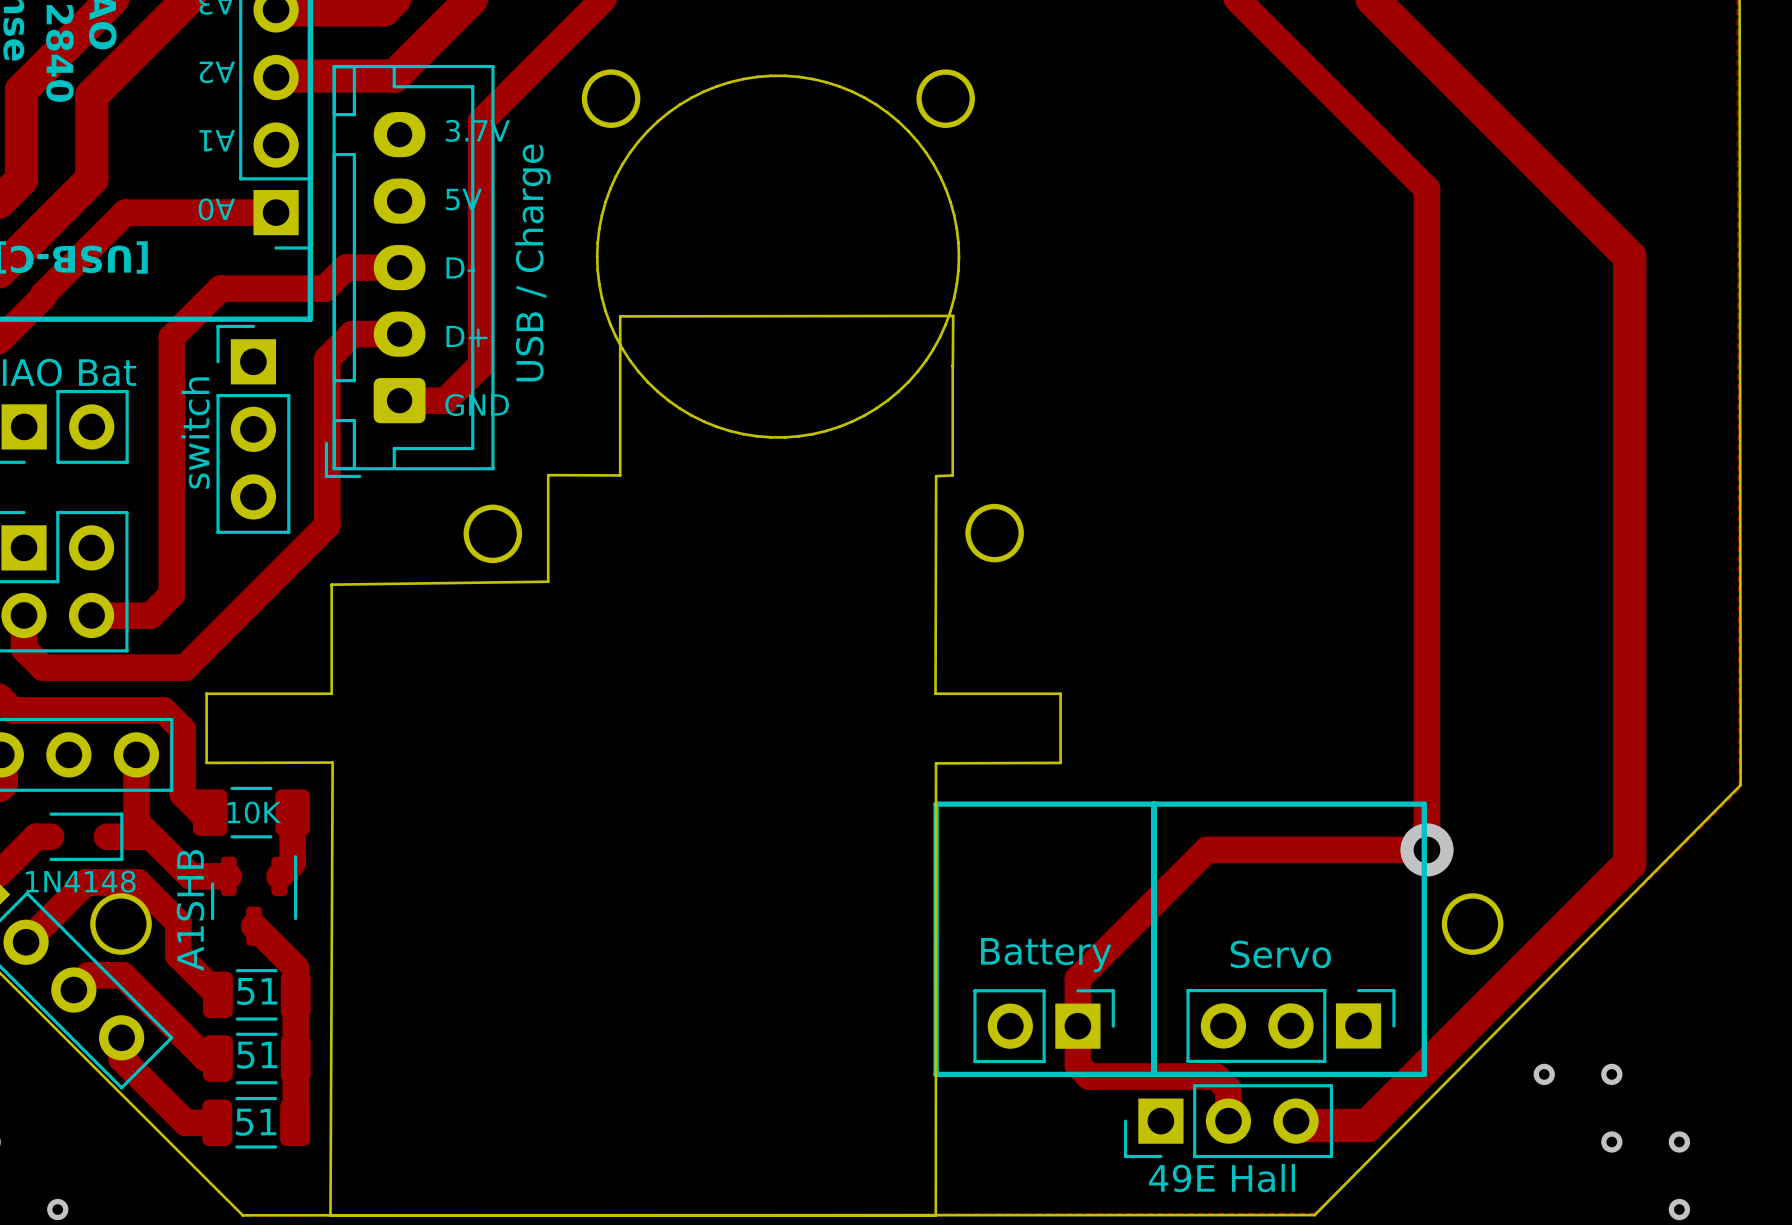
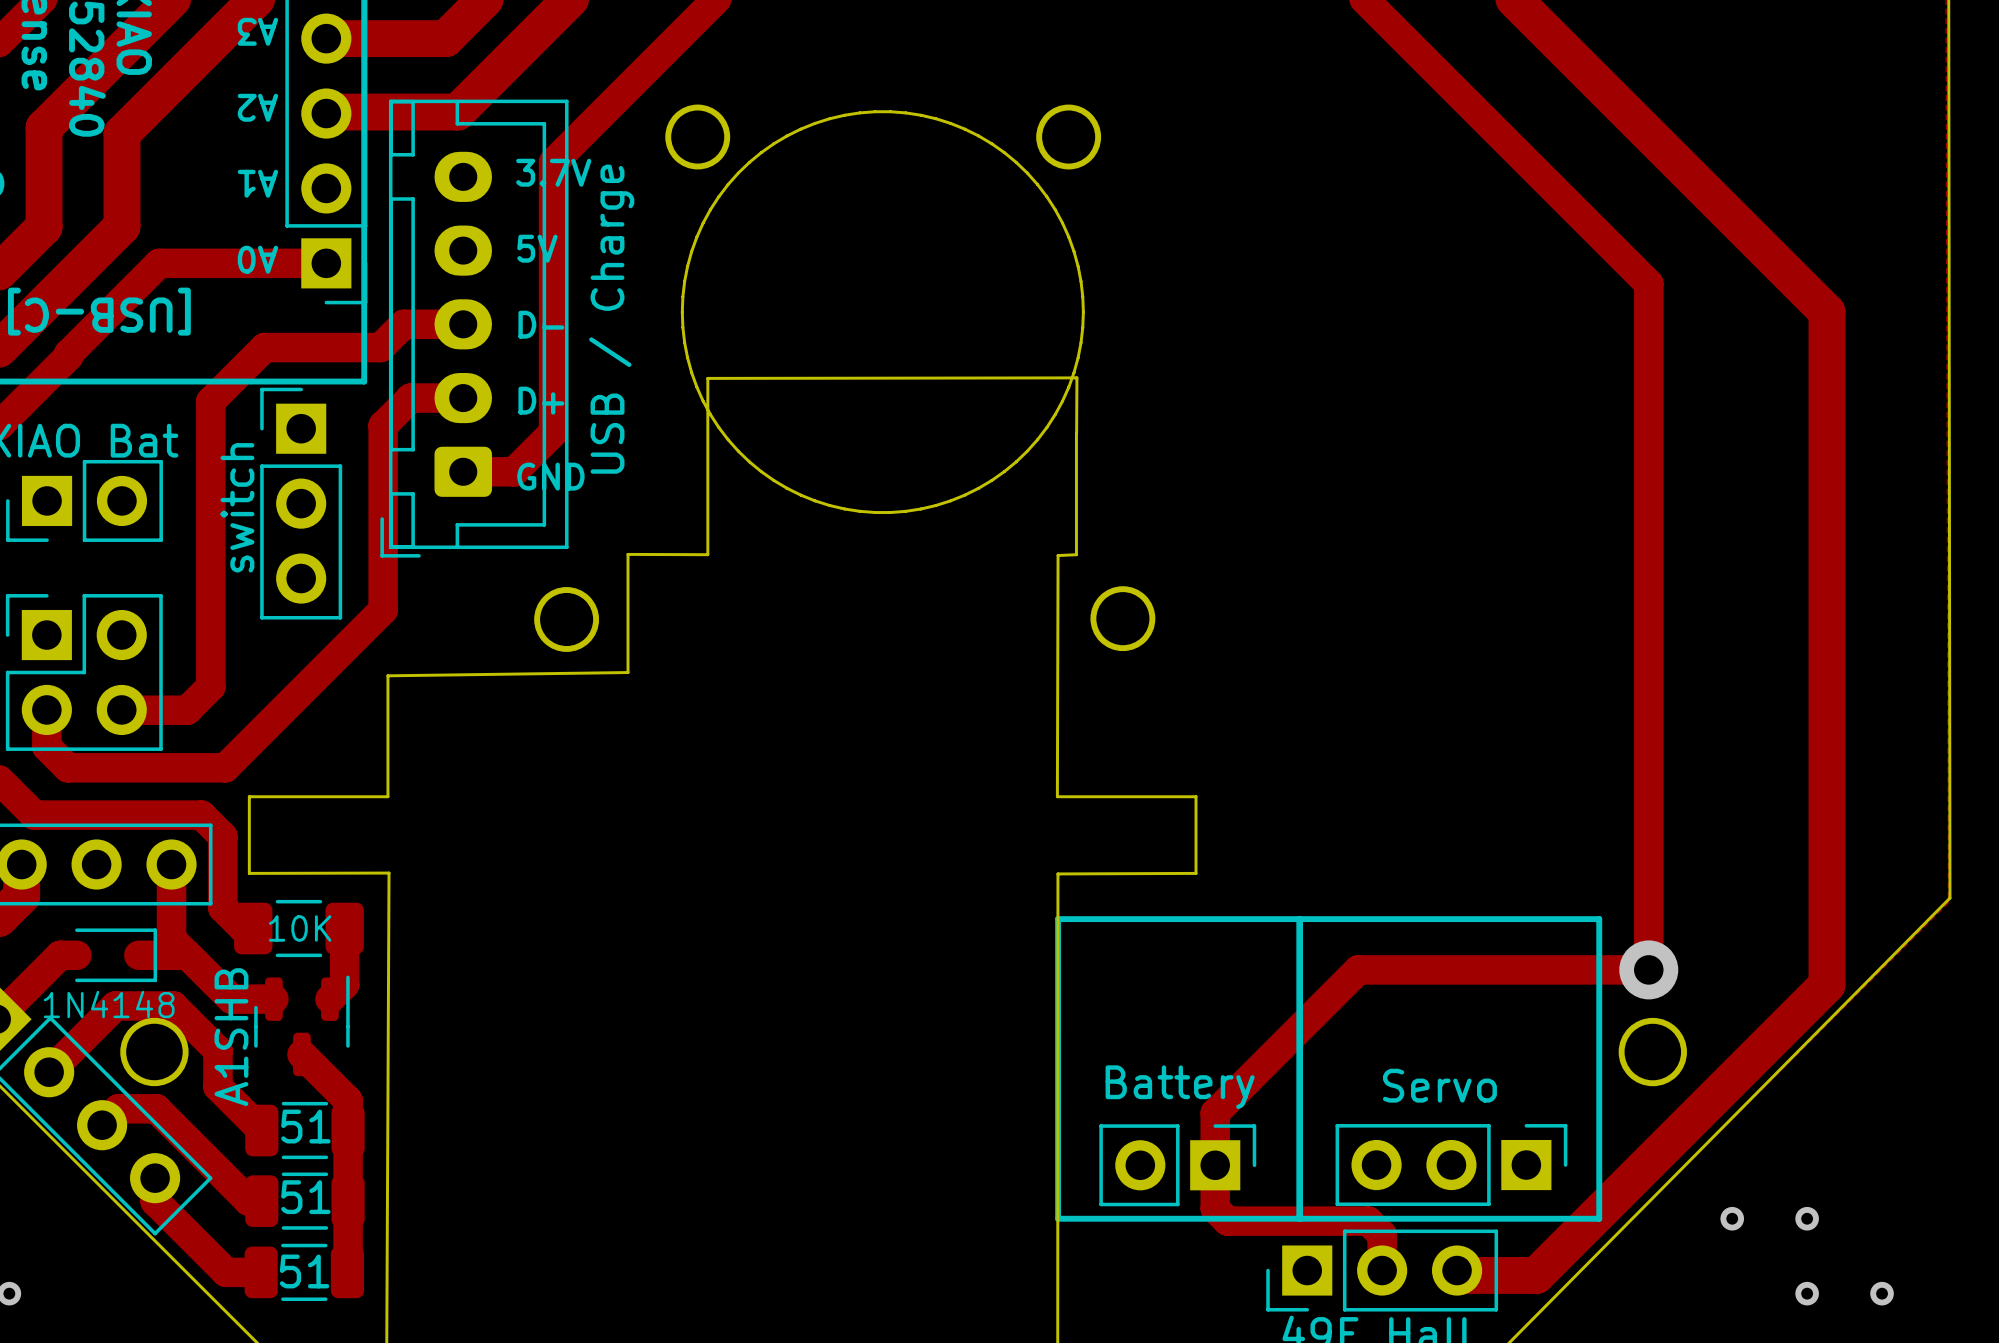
track: (1426, 189) (1426, 849) -> (1602, 237) (1648, 283) (1648, 969) (1602, 969)
via position: (1426, 849) -> (1648, 969)

